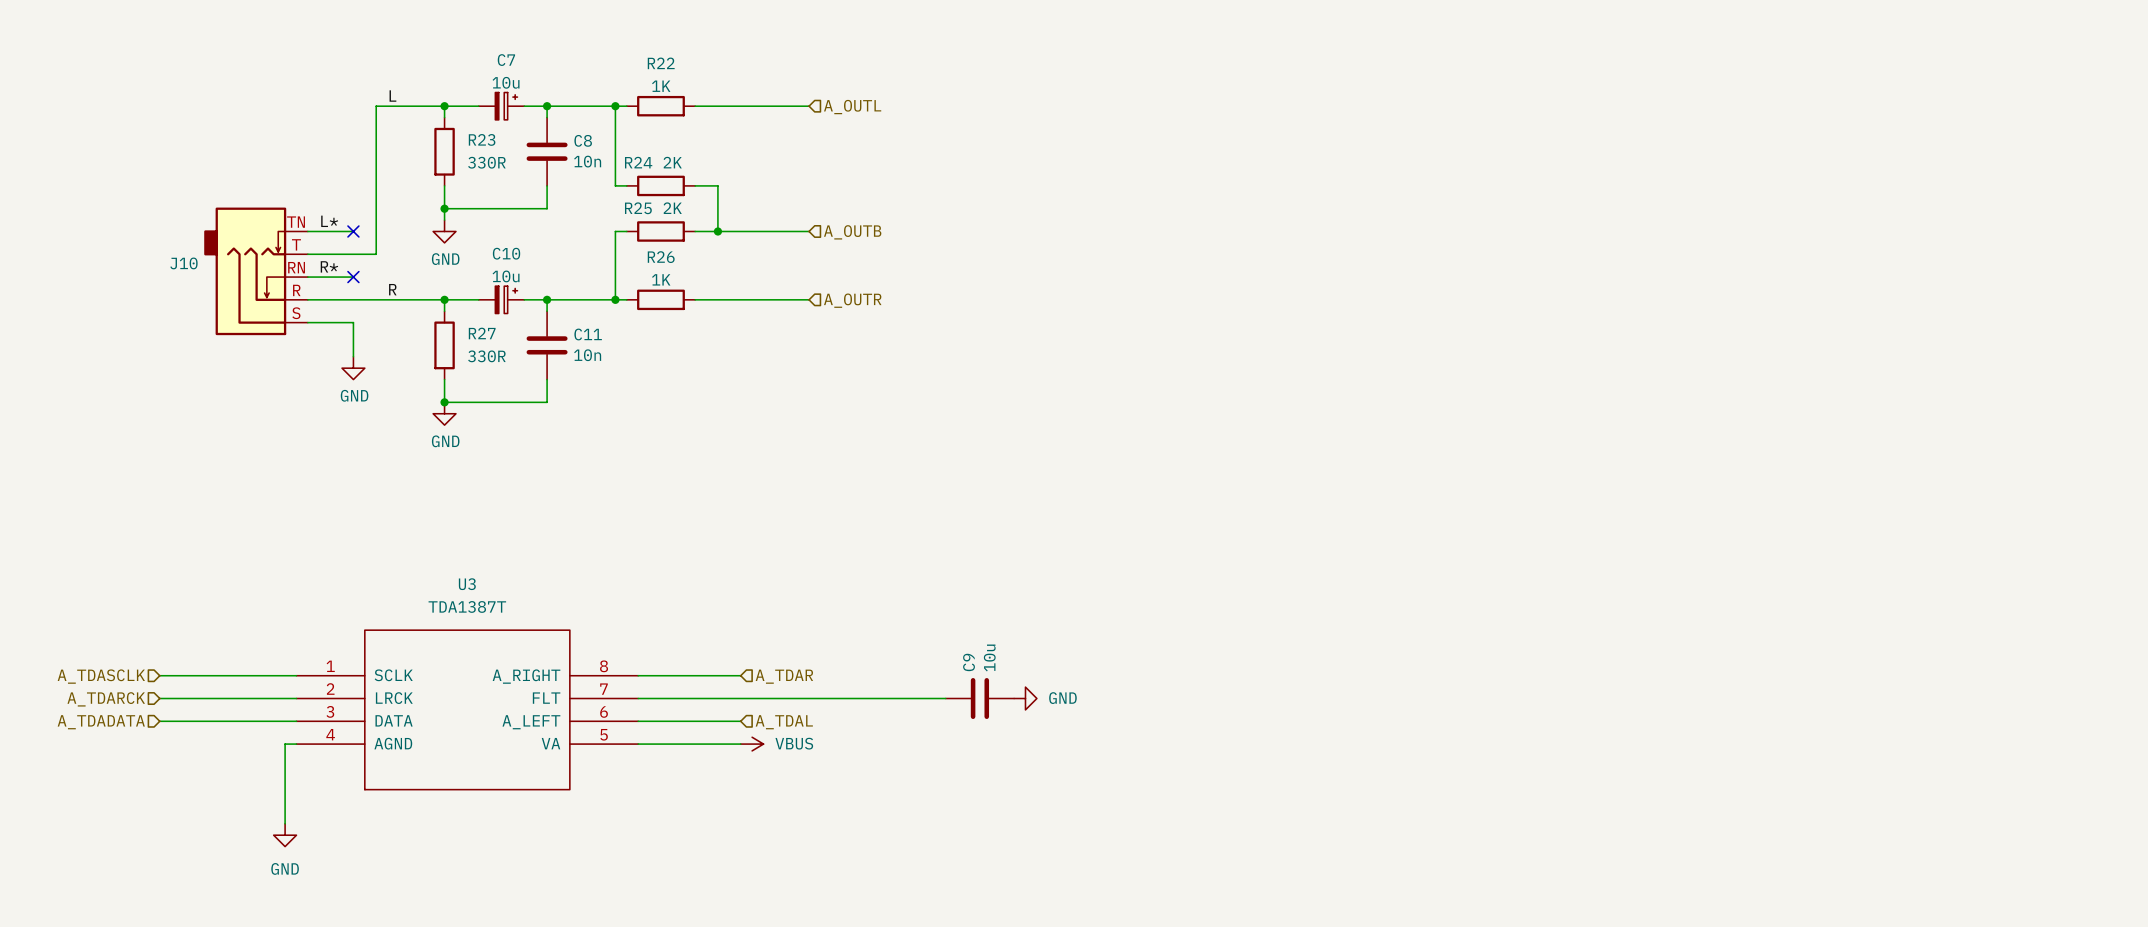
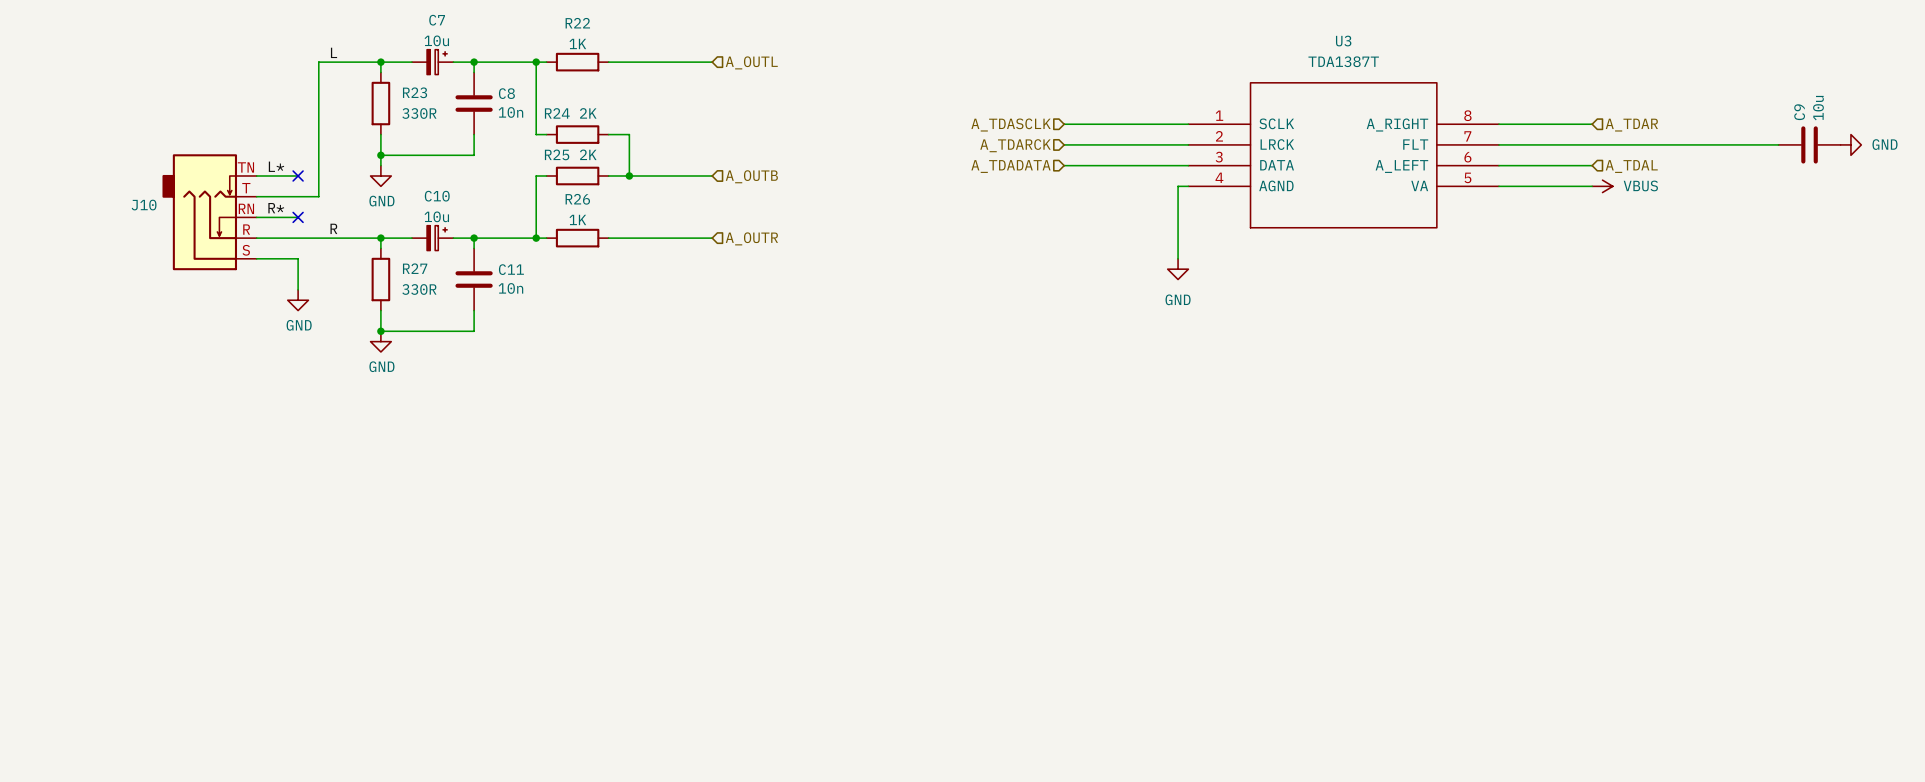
wire: none -> (1064, 124) (1188, 124)
wire: none -> (1498, 124) (1592, 124)
hierarchical label: none -> A_TDASCLK (1011, 125)
hierarchical label: none -> A_TDAR (1631, 125)
wire: none -> (1064, 144) (1188, 144)
wire: none -> (1498, 144) (1778, 144)
power symbol: none -> GND (1850, 144)
hierarchical label: none -> A_TDARCK (1015, 145)
wire: none -> (1064, 165) (1188, 165)
wire: none -> (1498, 165) (1592, 165)
hierarchical label: none -> A_TDADATA (1010, 166)
hierarchical label: none -> A_TDAL (1631, 166)
wire: none -> (1188, 186) (1178, 186) (1178, 258)
wire: none -> (1498, 186) (1592, 186)
power symbol: none -> VBUS (1602, 186)
power symbol: none -> GND (1178, 269)
wire: (159, 675) (296, 675) -> none
wire: (638, 675) (740, 675) -> none
hierarchical label: A_TDASCLK (101, 676) -> none
hierarchical label: A_TDAR (784, 676) -> none
wire: (159, 698) (296, 698) -> none
wire: (638, 698) (945, 698) -> none
C9 position: (979, 698) -> (1809, 144)
power symbol: GND (1025, 698) -> none
hierarchical label: A_TDARCK (106, 699) -> none
U3 position: (467, 709) -> (1343, 155)
wire: (159, 721) (296, 721) -> none
wire: (638, 721) (740, 721) -> none
hierarchical label: A_TDADATA (101, 722) -> none
hierarchical label: A_TDAL (784, 722) -> none
wire: (296, 744) (285, 744) (285, 823) -> none
wire: (638, 744) (740, 744) -> none
power symbol: VBUS (752, 744) -> none
power symbol: GND (285, 835) -> none

